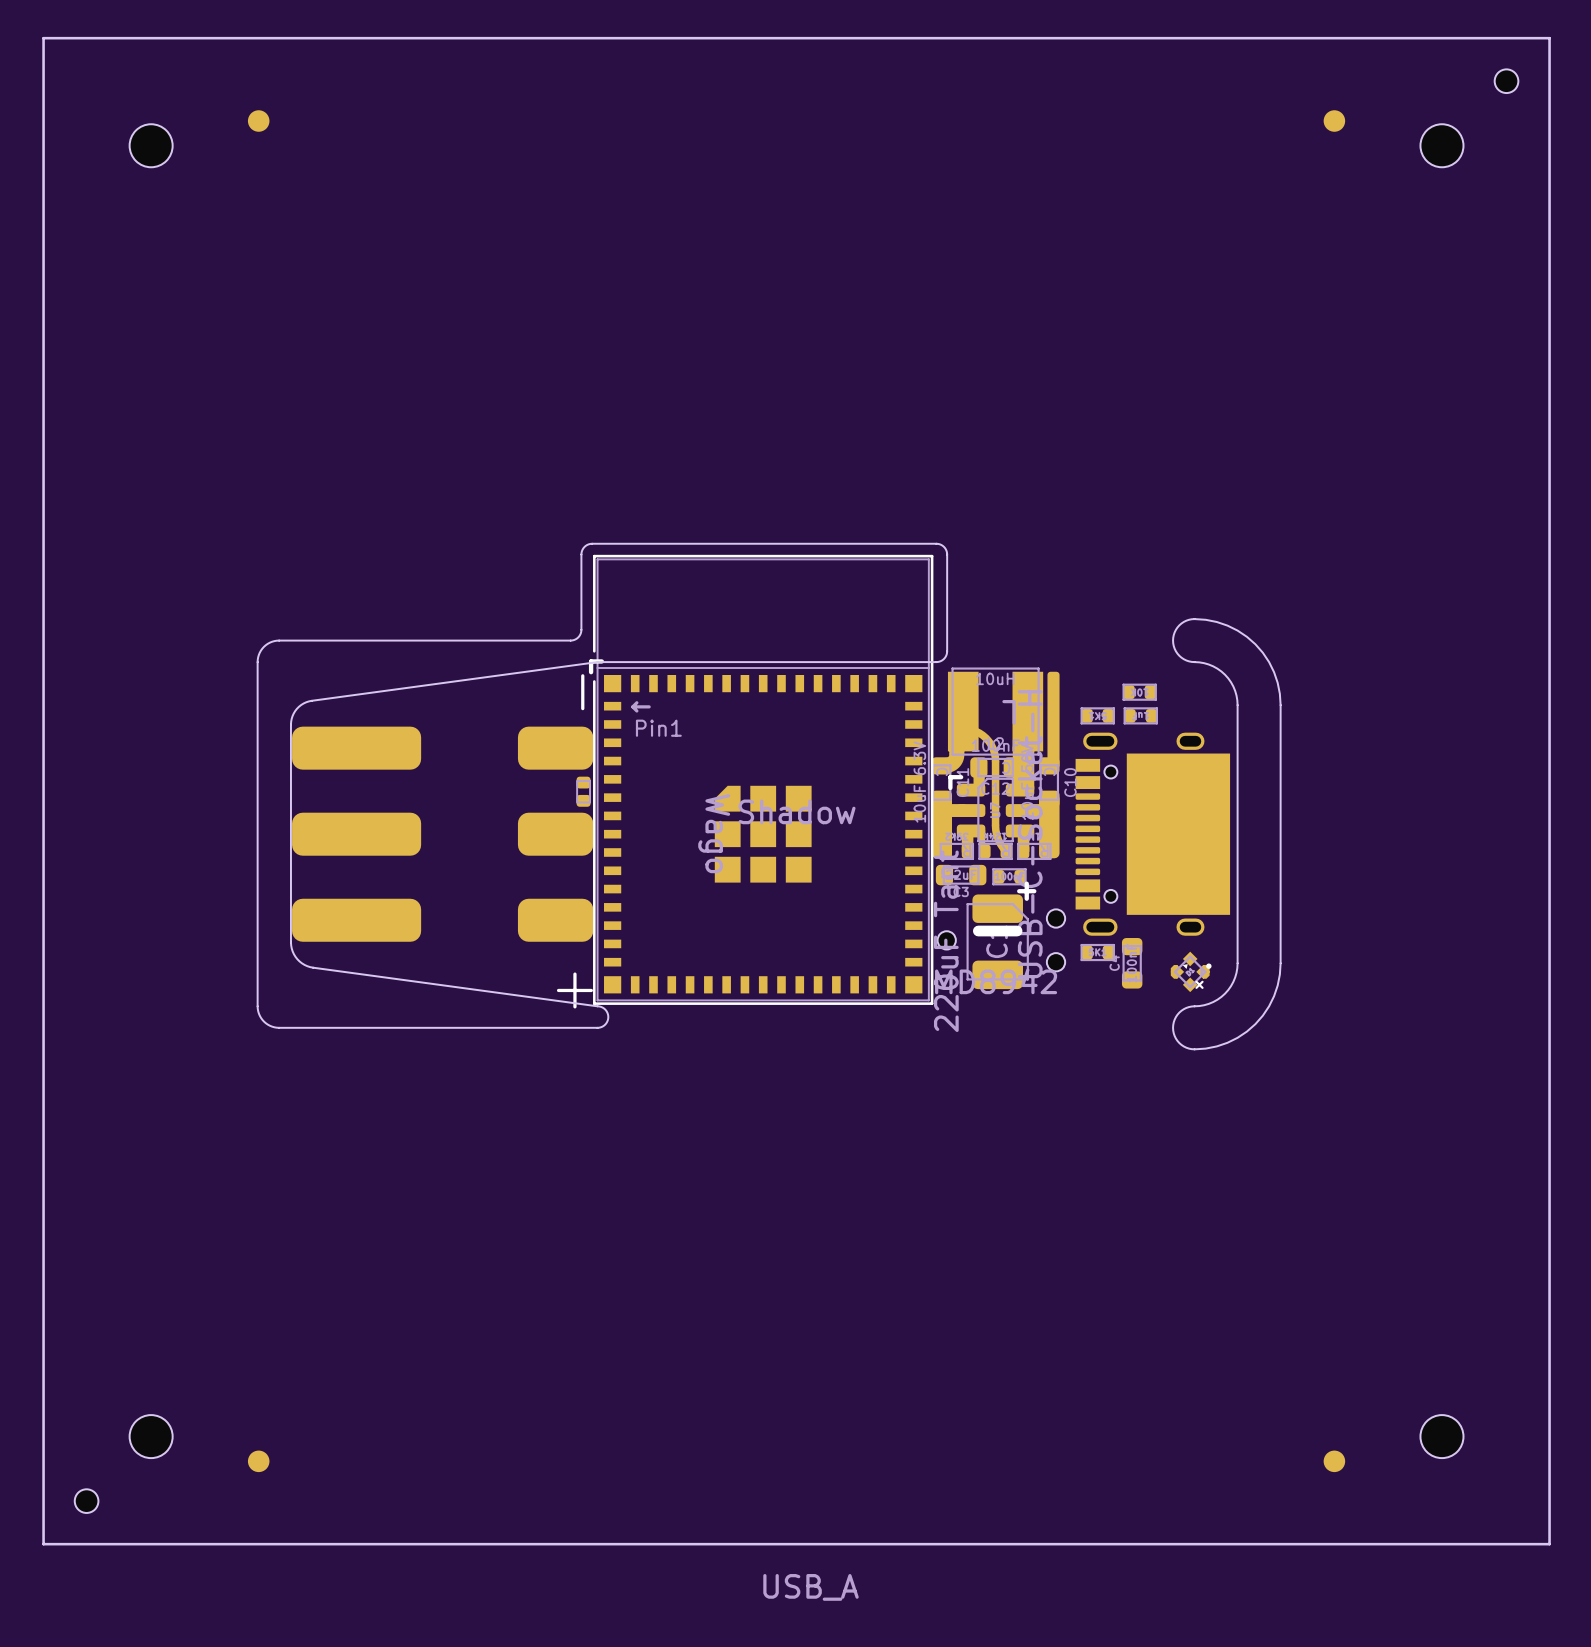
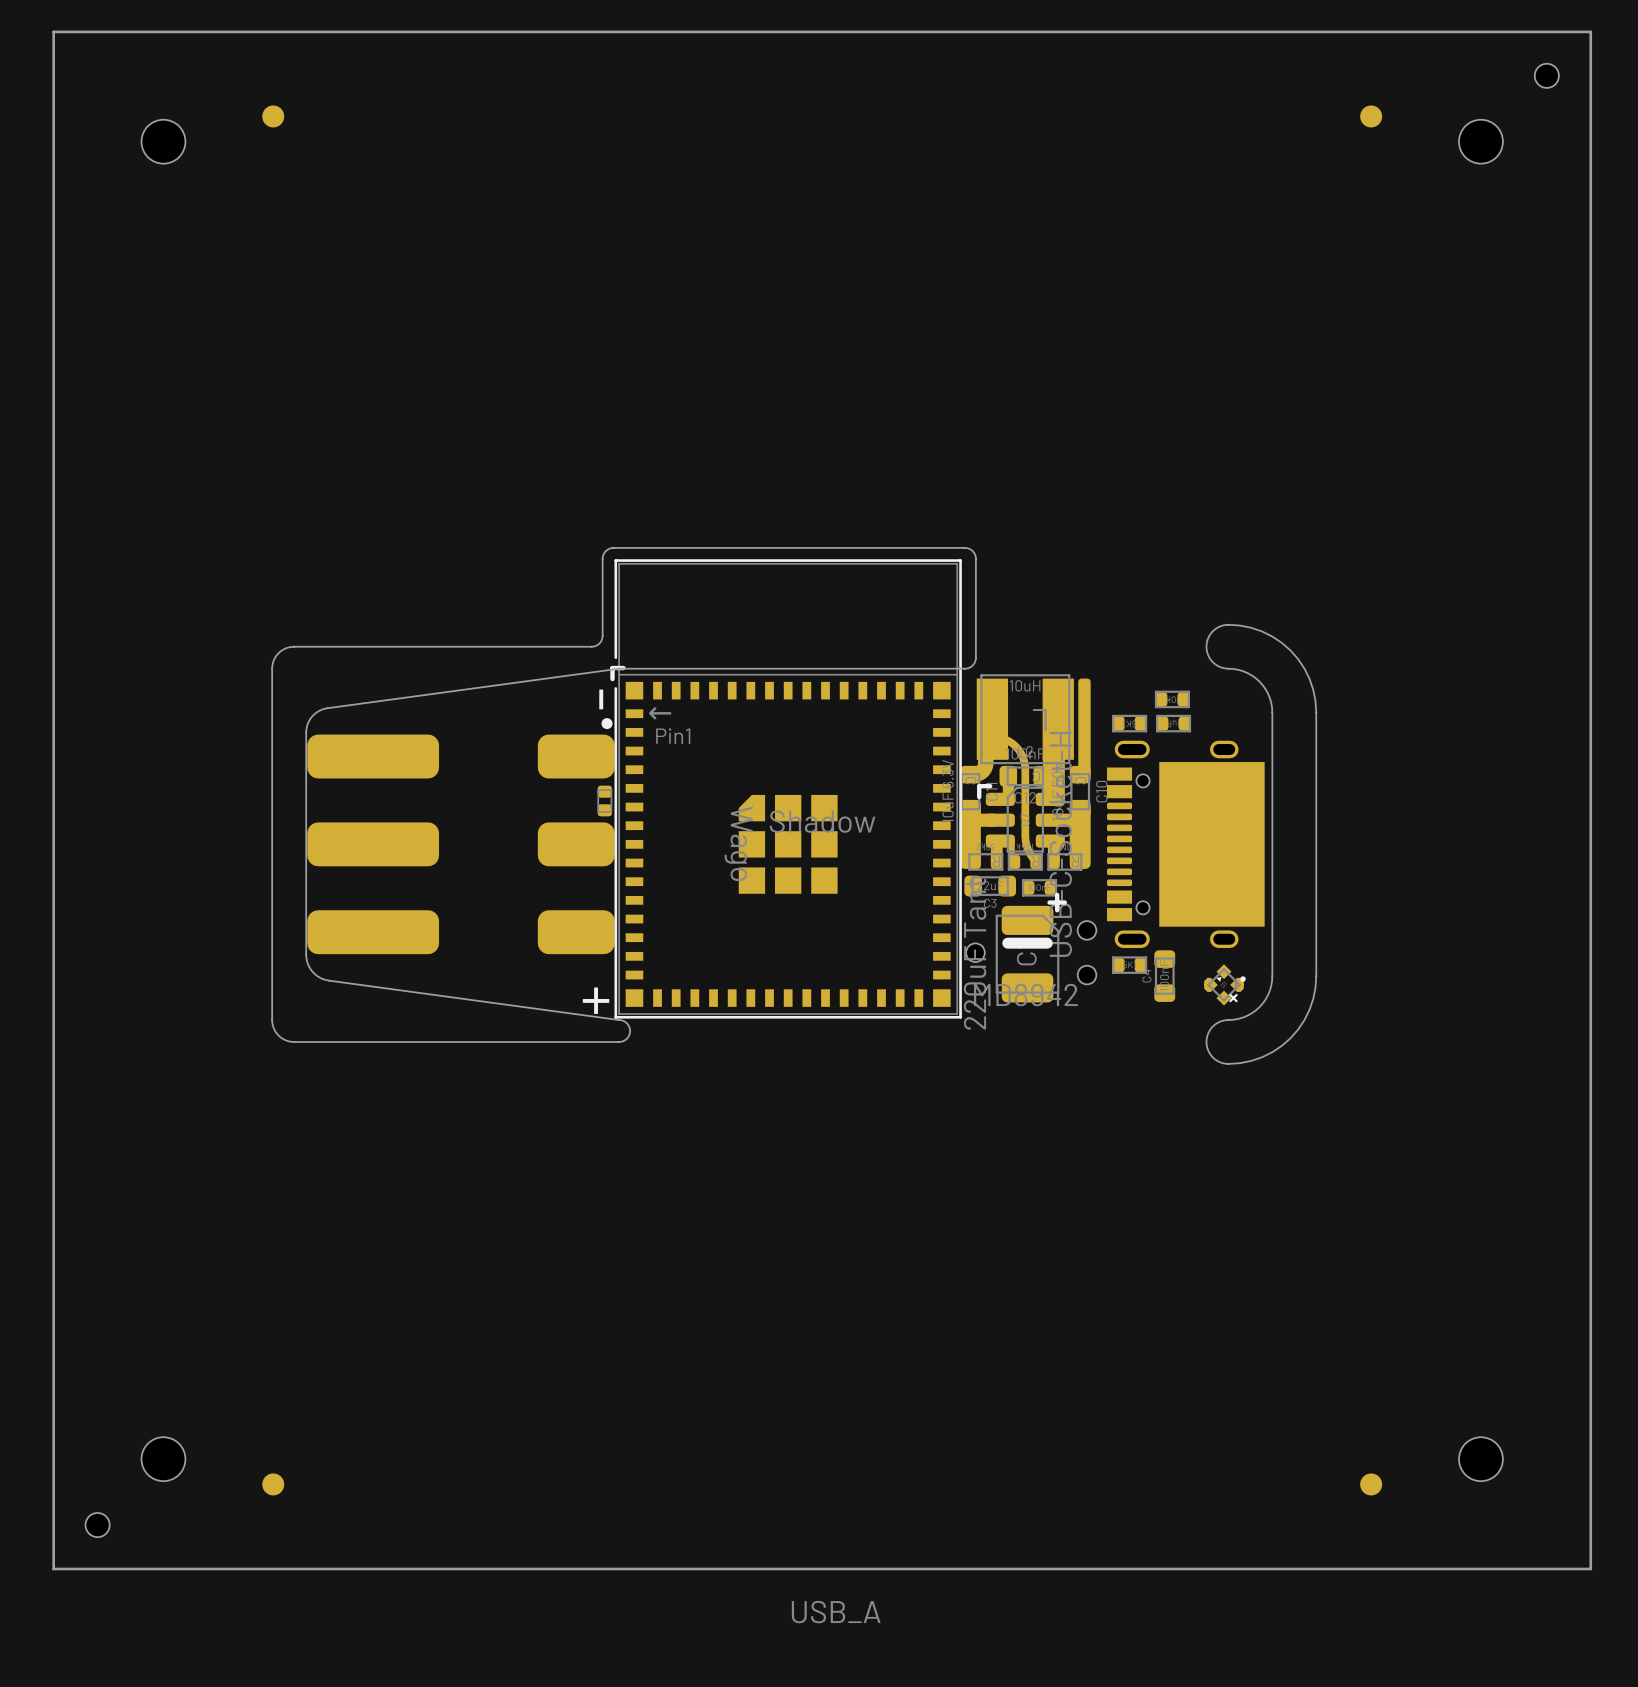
part footprint: [292, 726, 594, 942] -> [307, 718, 615, 955]

